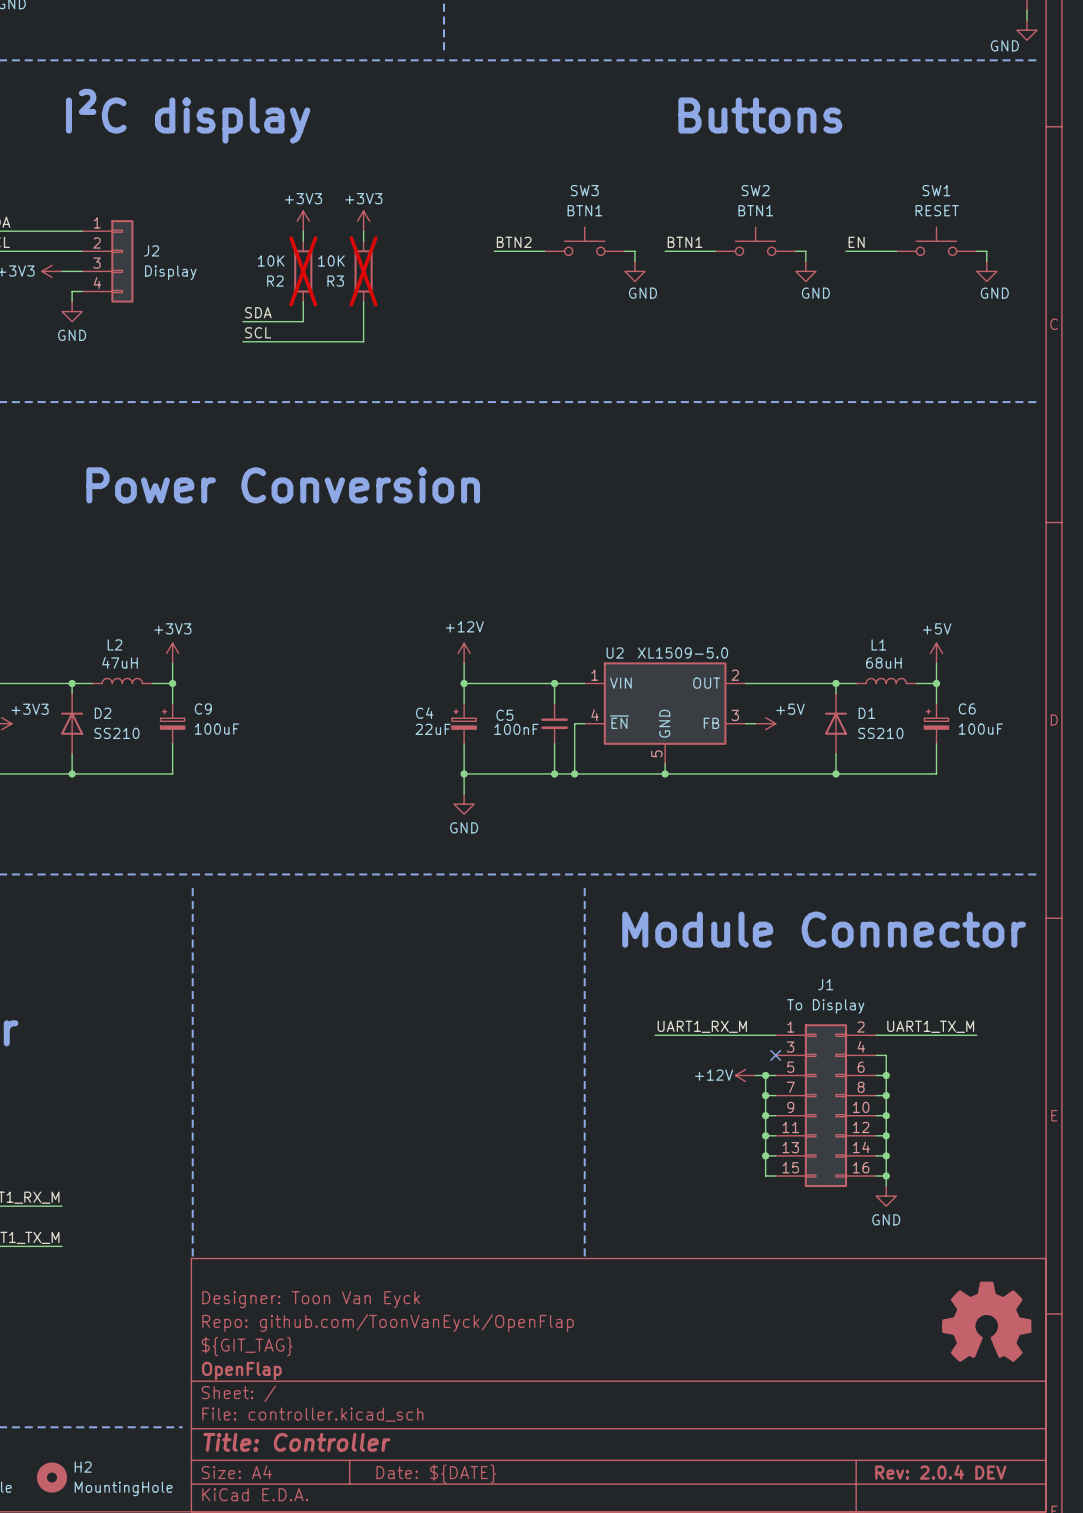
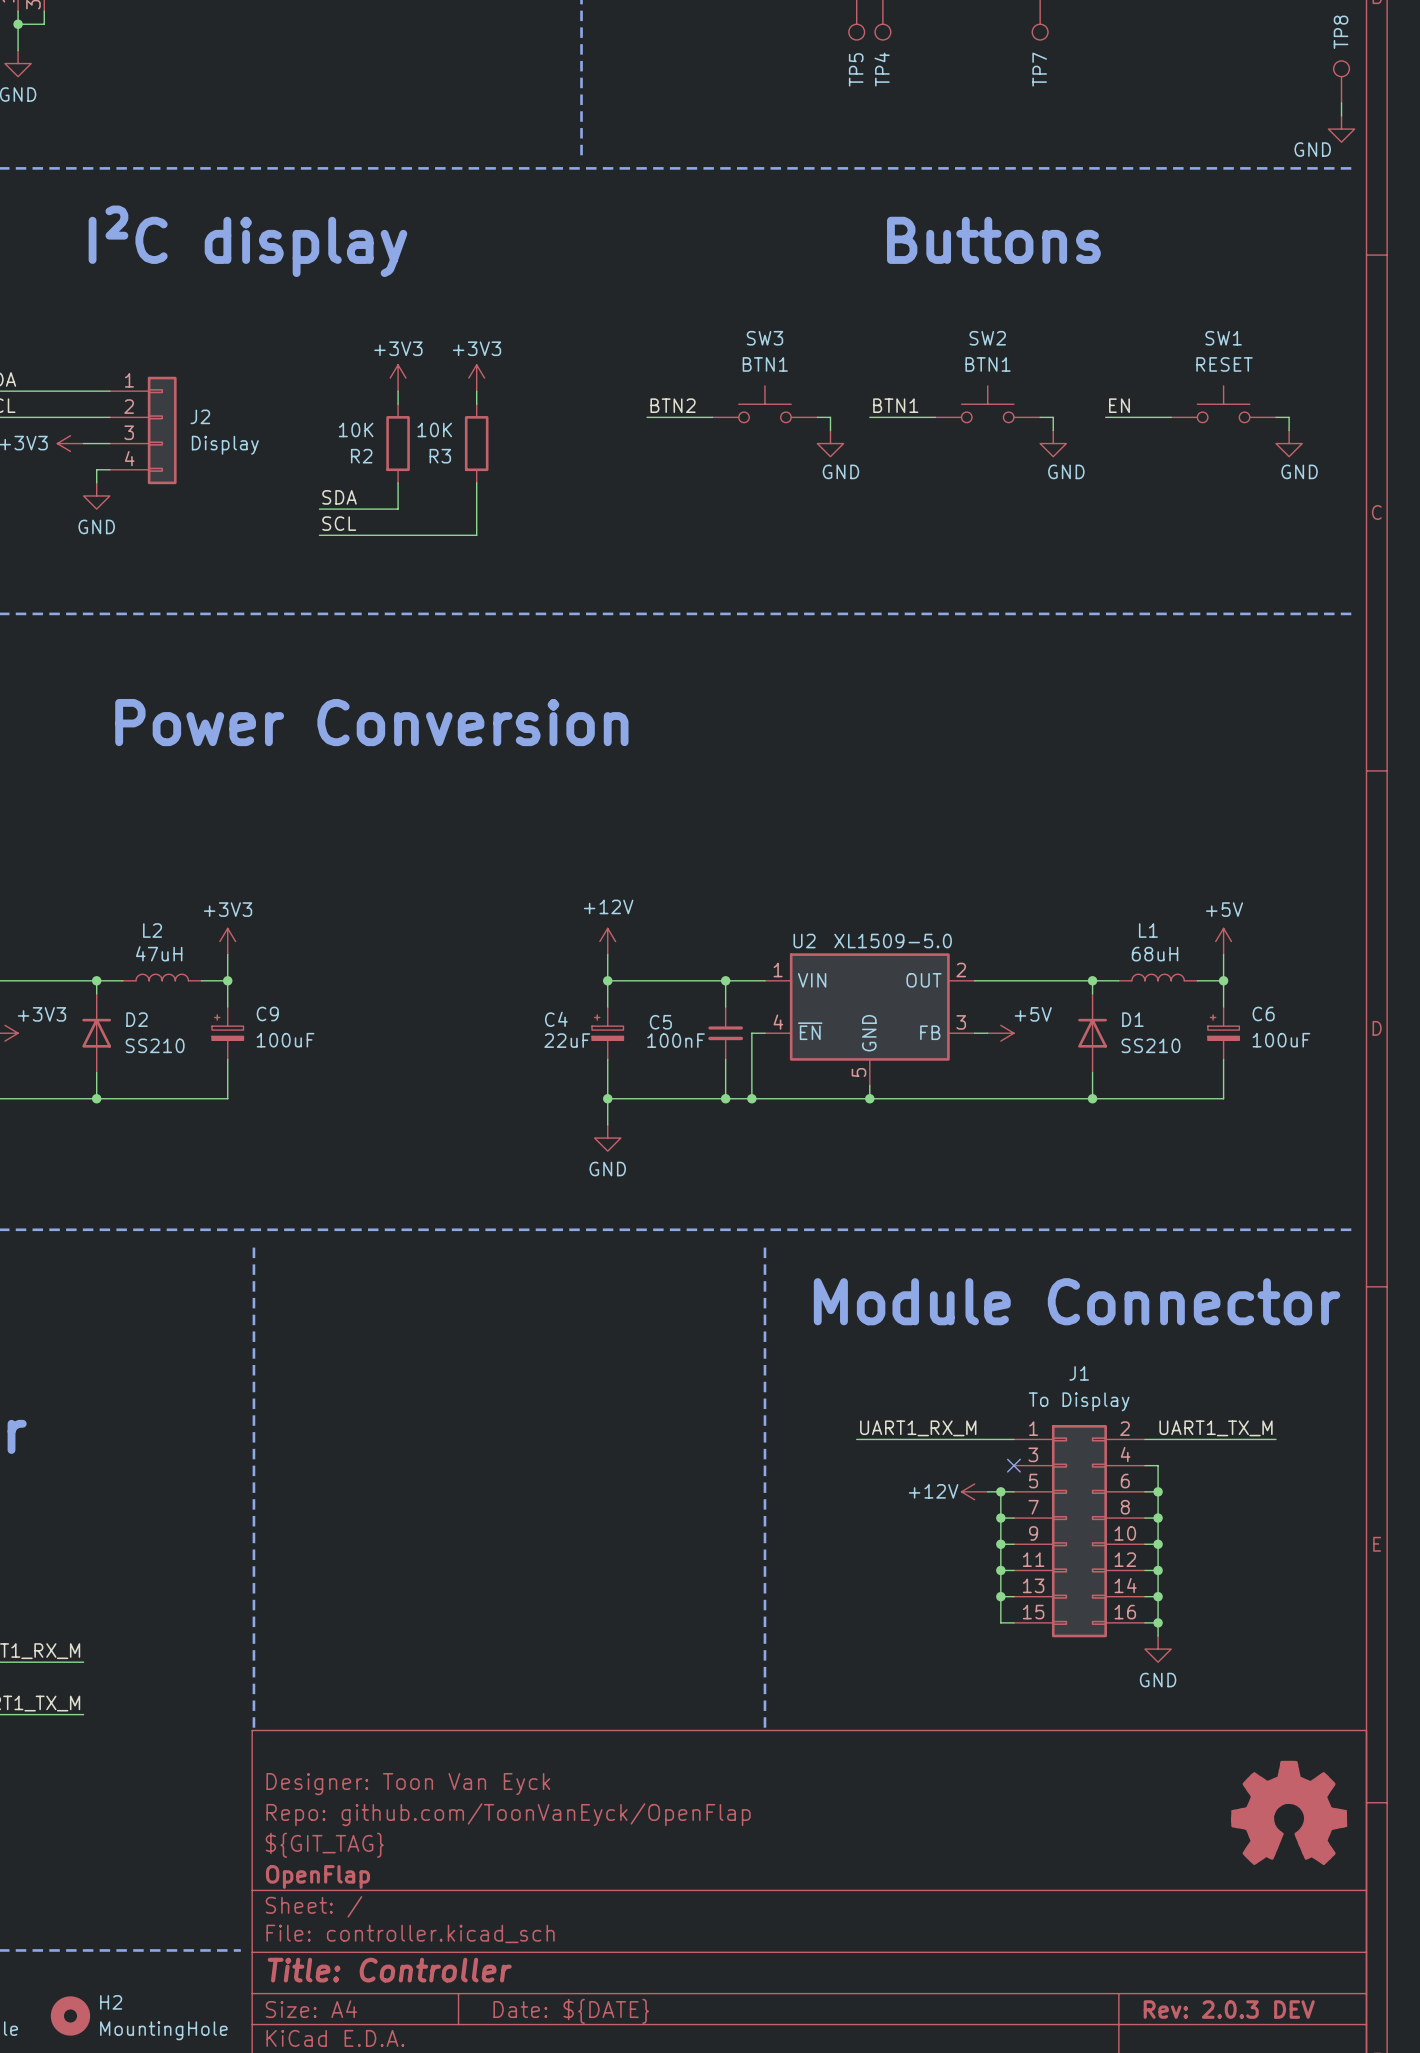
R2 do-not-place cross: (303, 271) -> none
R3 do-not-place cross: (363, 271) -> none
title block: Rev: 2.0.4 DEV (940, 1472) -> Rev: 2.0.3 DEV (1229, 2009)

